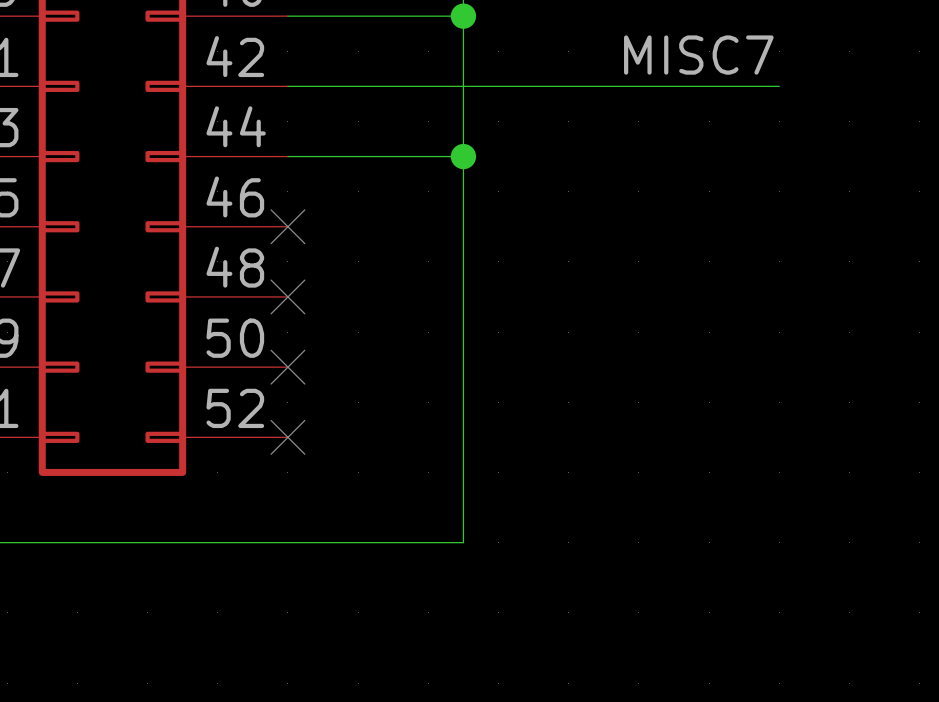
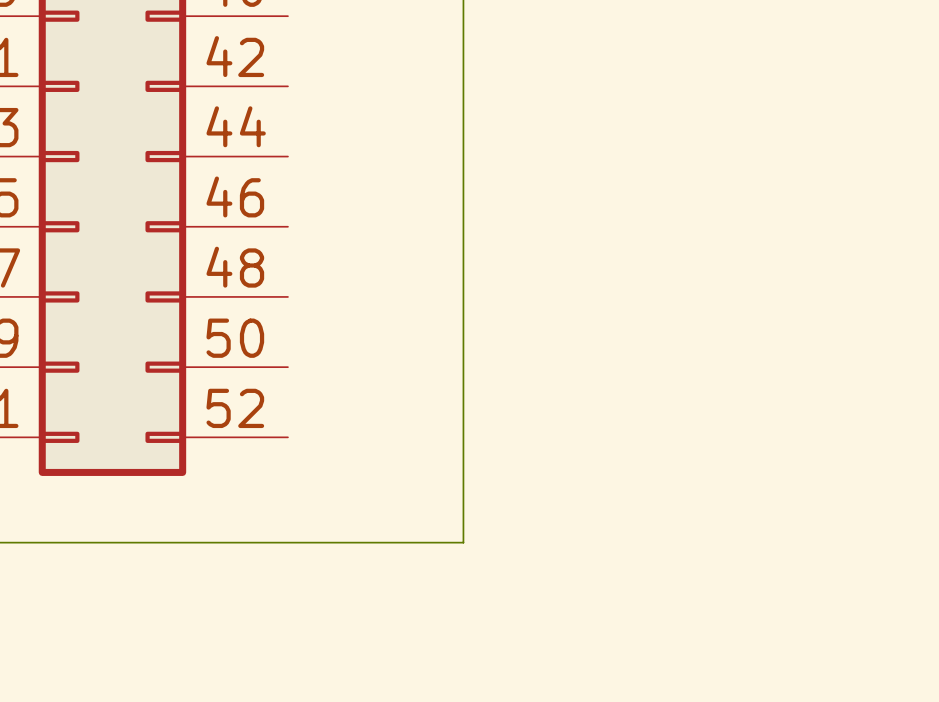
wire: (287, 16) (463, 16) -> none
junction: (463, 16) -> none
label: MISC7 (698, 55) -> none
wire: (287, 86) (779, 86) -> none
wire: (287, 156) (463, 156) -> none
junction: (463, 156) -> none
no-connect mark: (287, 226) -> none
no-connect mark: (287, 296) -> none
no-connect mark: (287, 367) -> none
no-connect mark: (287, 437) -> none

